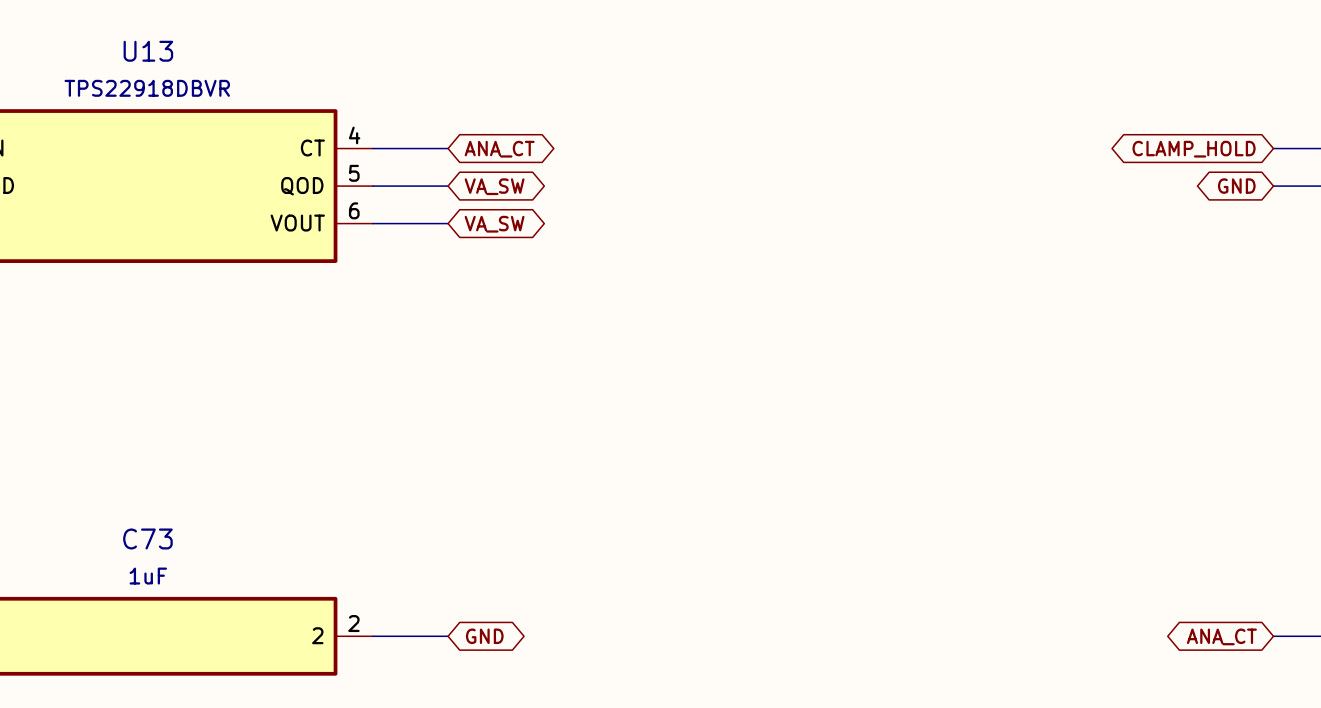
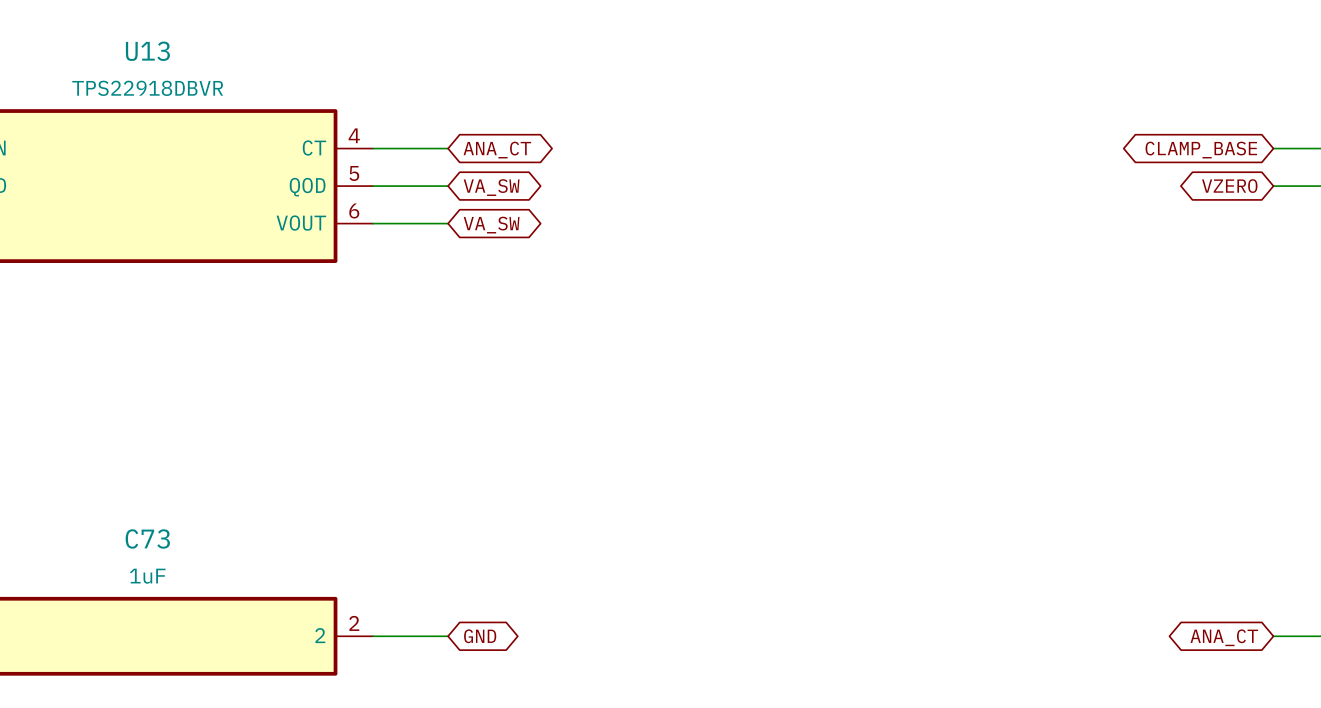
global label: CLAMP_HOLD (1194, 149) -> CLAMP_BASE (1201, 150)
global label: GND (1236, 186) -> VZERO (1229, 186)

